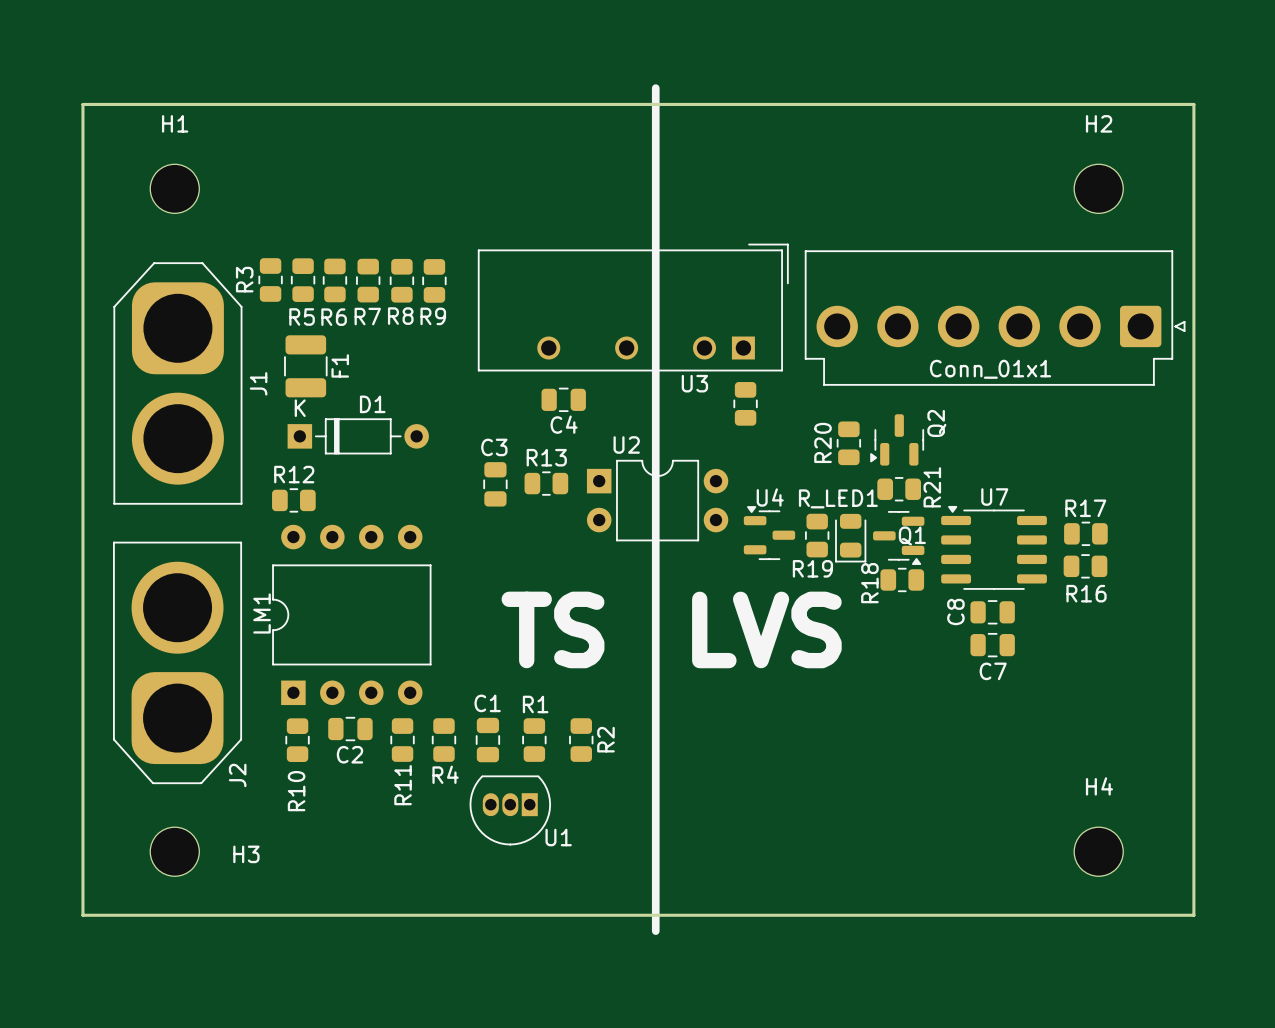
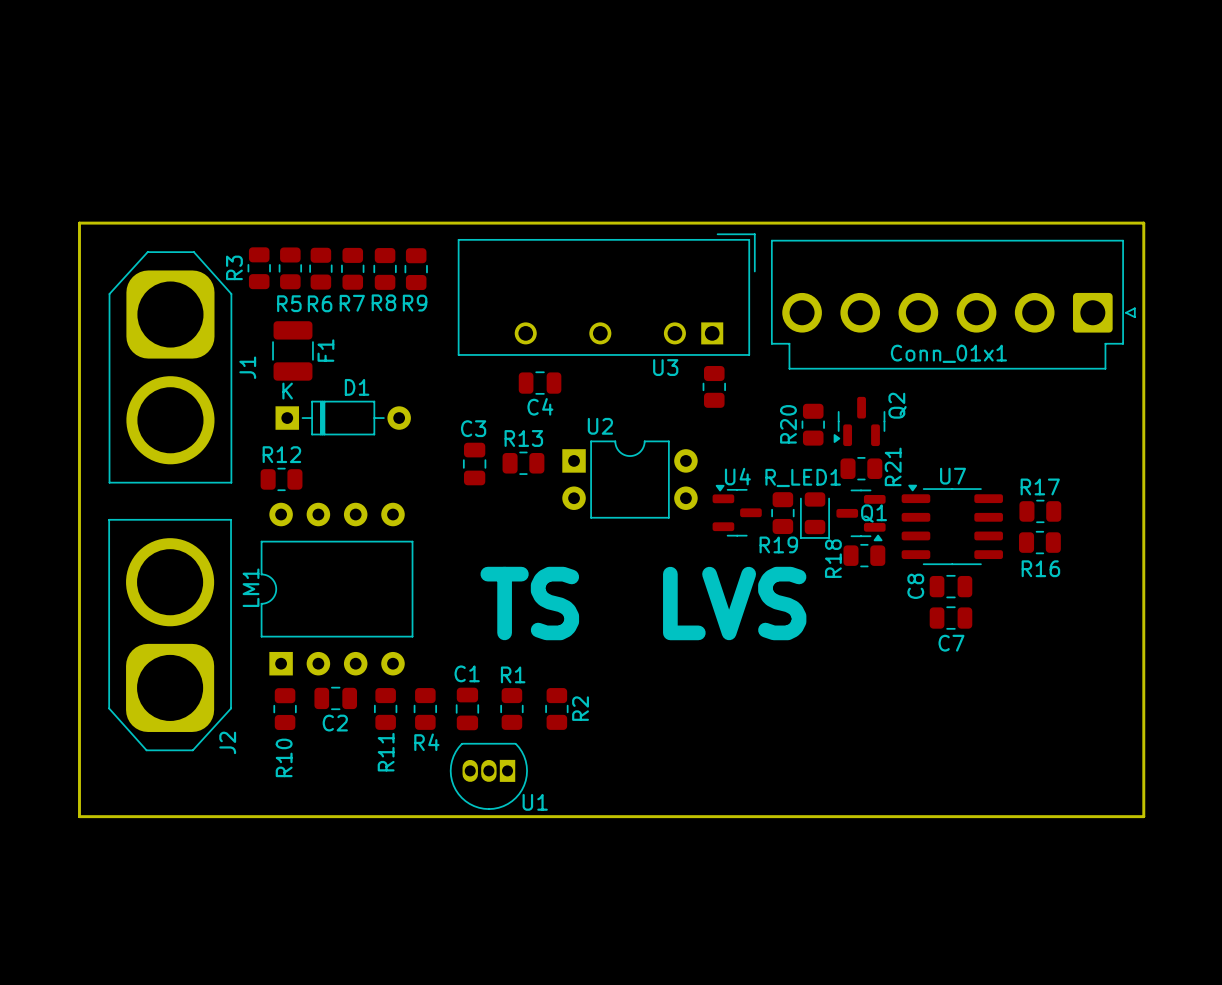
line: (655, 88) (655, 931) -> none
H1: (174, 188) -> none
H2: (1098, 188) -> none
board edge: (82, 232) (82, 104) (1193, 104) (1193, 232) -> (79, 223) (1143, 223)
H3: (174, 851) -> none
H4: (1098, 851) -> none
board edge: (82, 852) (82, 915) (1193, 915) (1193, 852) -> (79, 816) (1143, 816)

